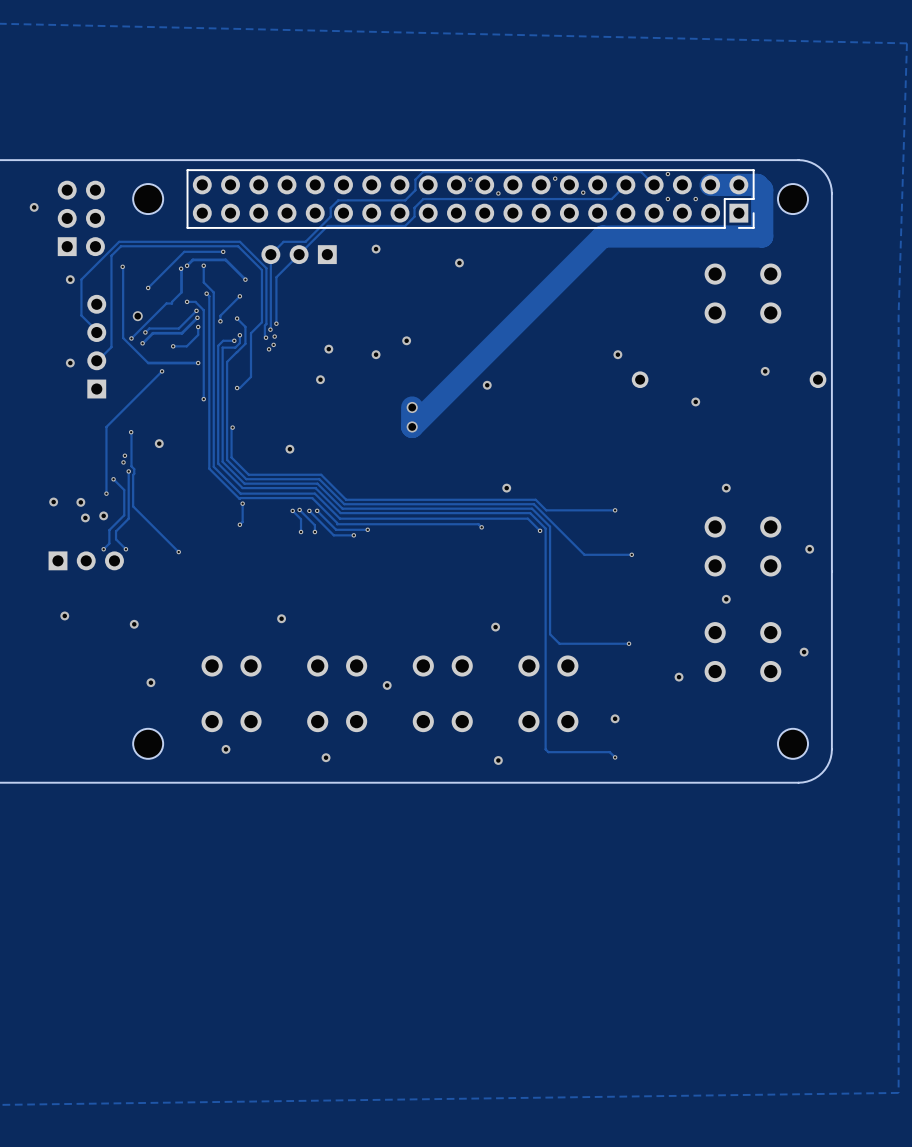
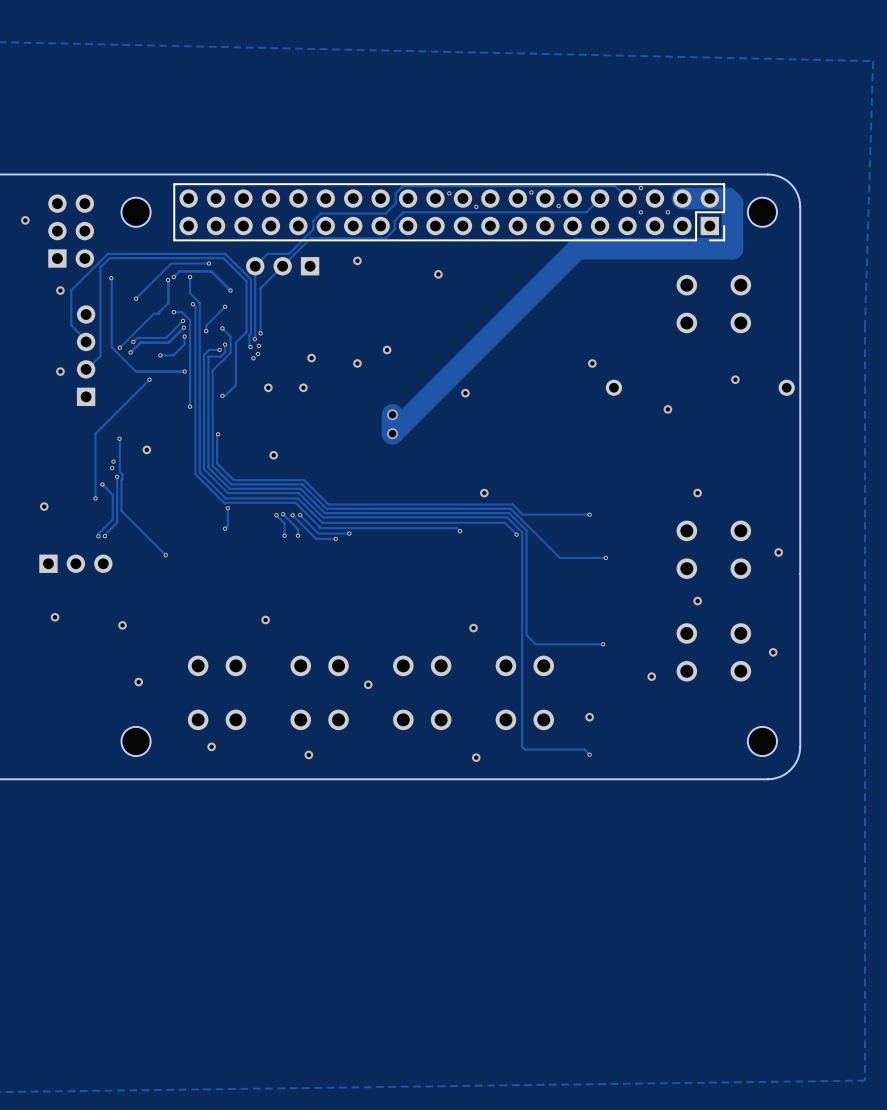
via: (137, 316) -> none
via: none -> (268, 387)
via: (80, 502) -> none
via: (103, 515) -> none
via: (85, 517) -> none
track: (109, 532) (109, 543) (103, 549) -> none
via: none -> (98, 536)
track: (116, 532) (116, 539) (125, 549) -> none
via: none -> (104, 536)
via: (103, 549) -> none
via: (125, 549) -> none

